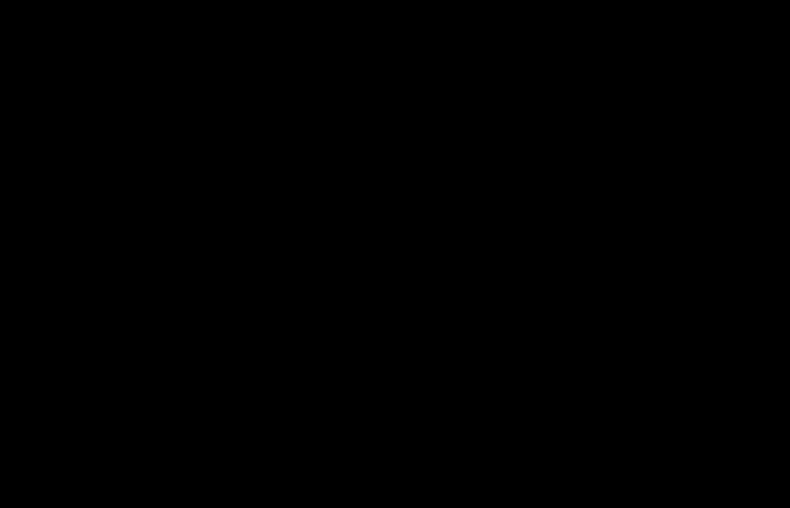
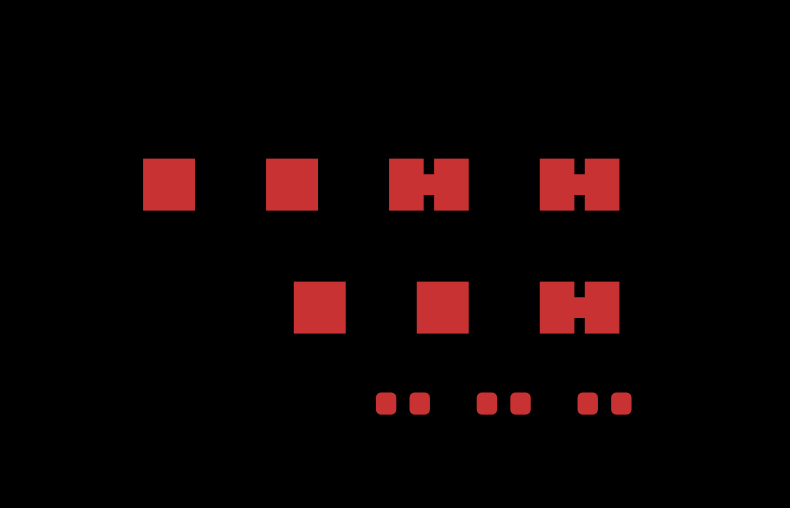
part: none -> (169, 184)
part: none -> (292, 184)
part: none -> (428, 184)
part: none -> (579, 184)
part: none -> (319, 307)
part: none -> (442, 307)
part: none -> (579, 307)
part: none -> (402, 403)
part: none -> (503, 403)
part: none -> (604, 403)

